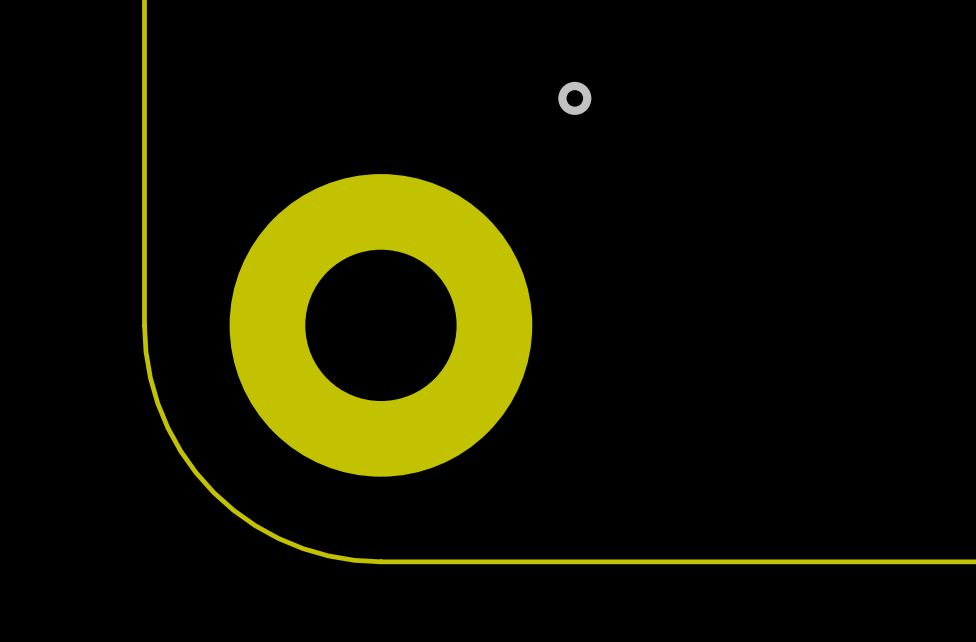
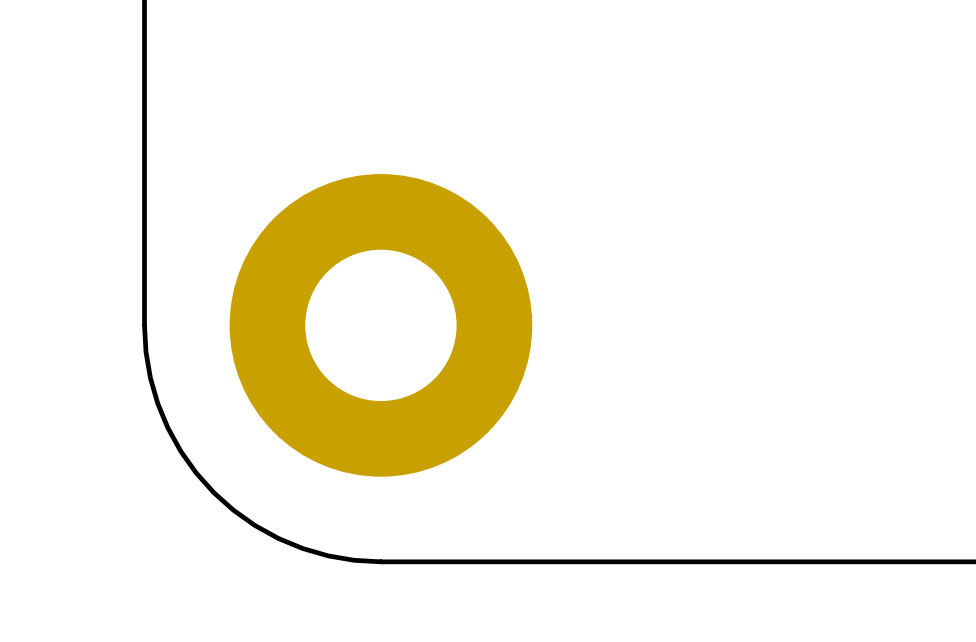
via: (574, 98) -> none

